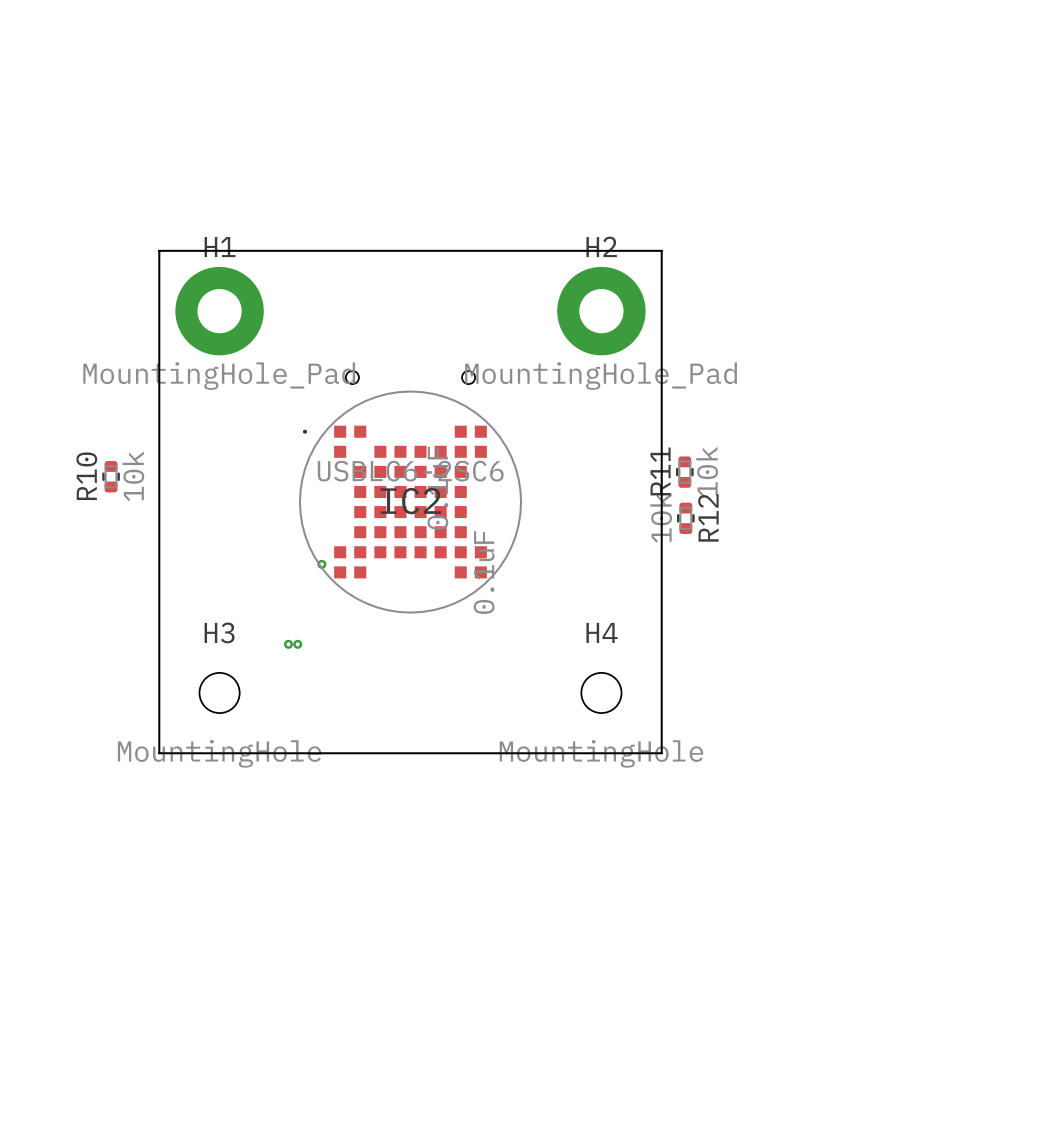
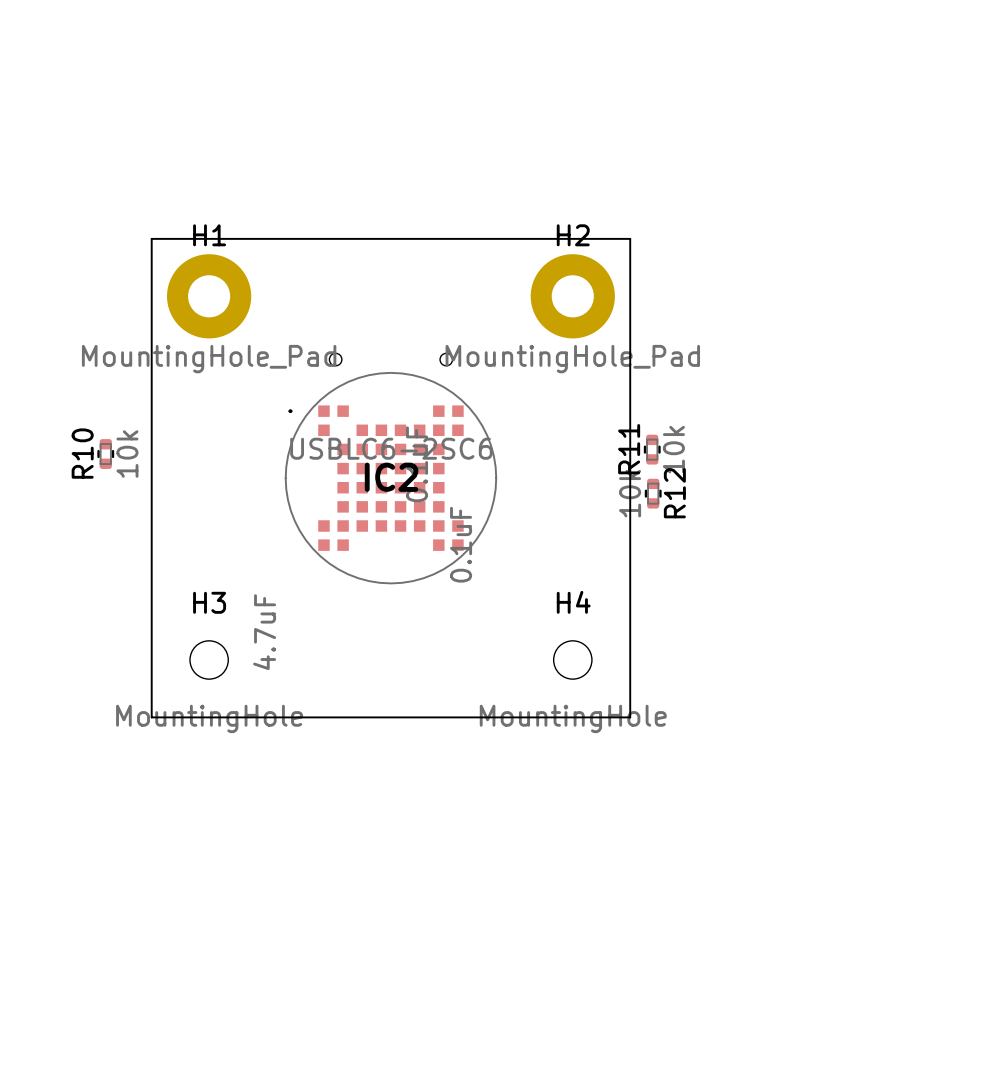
via: (321, 564) -> none
via: (288, 644) -> none
via: (297, 644) -> none
part: none -> 4.7uF (264, 632)

